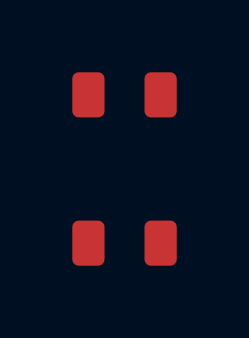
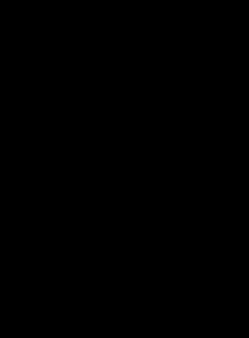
part: (124, 94) -> none
part: (124, 243) -> none

